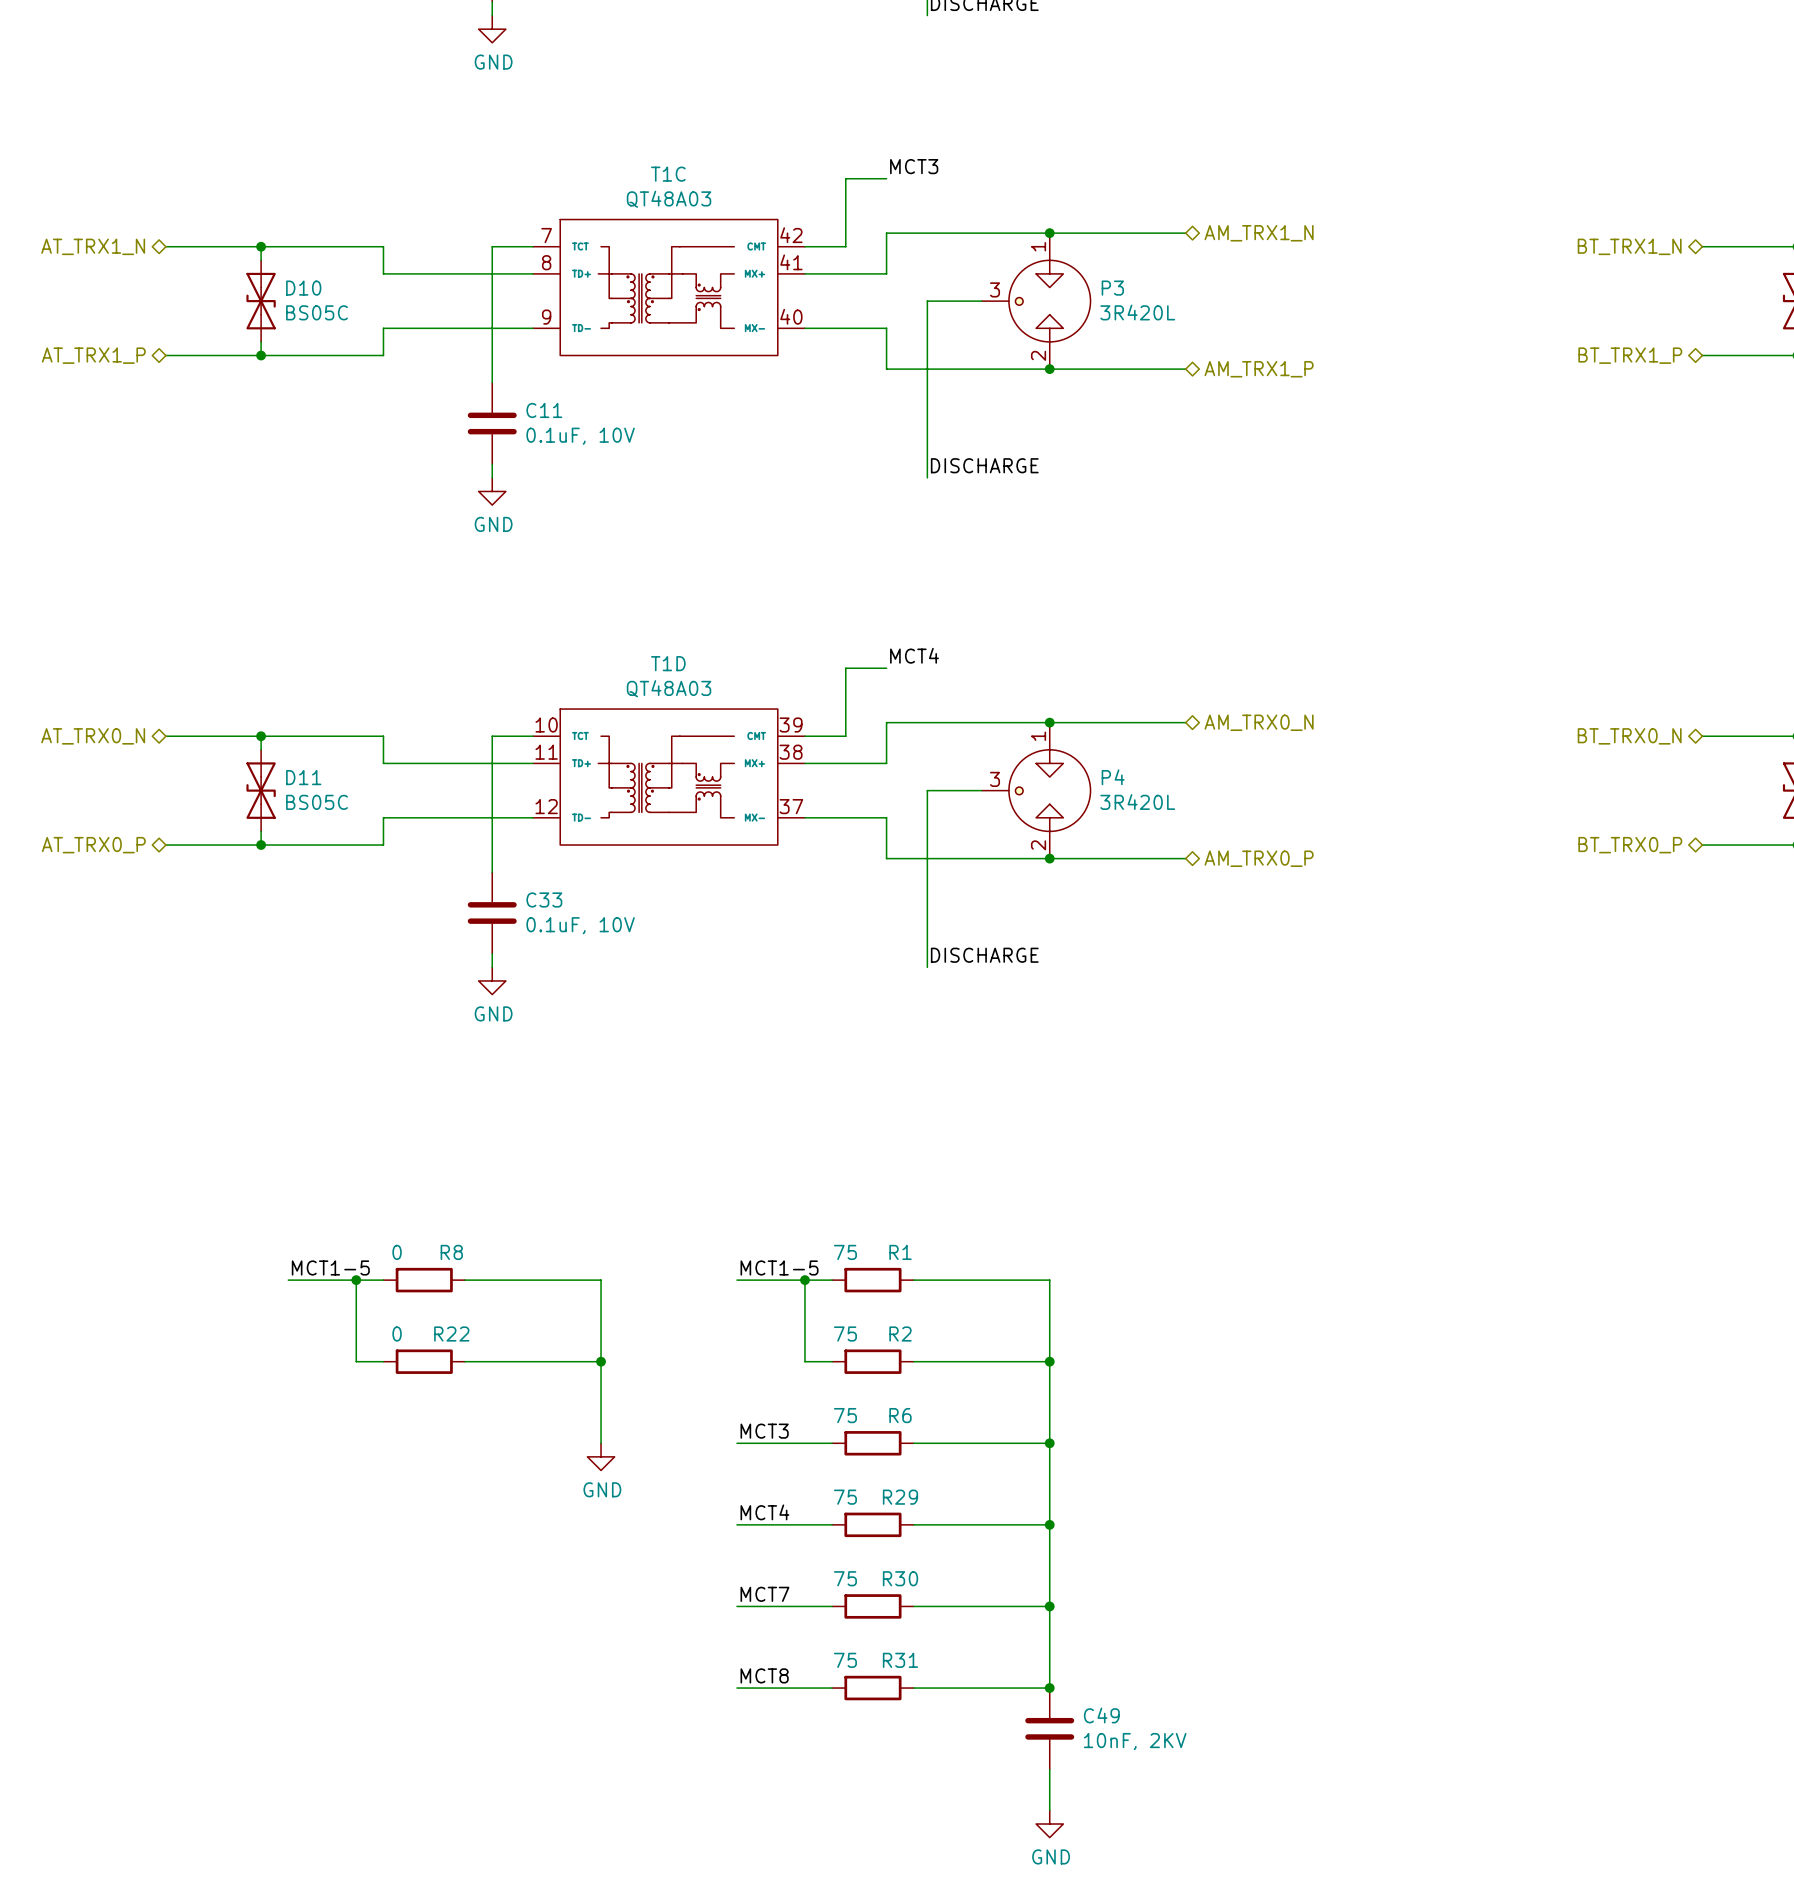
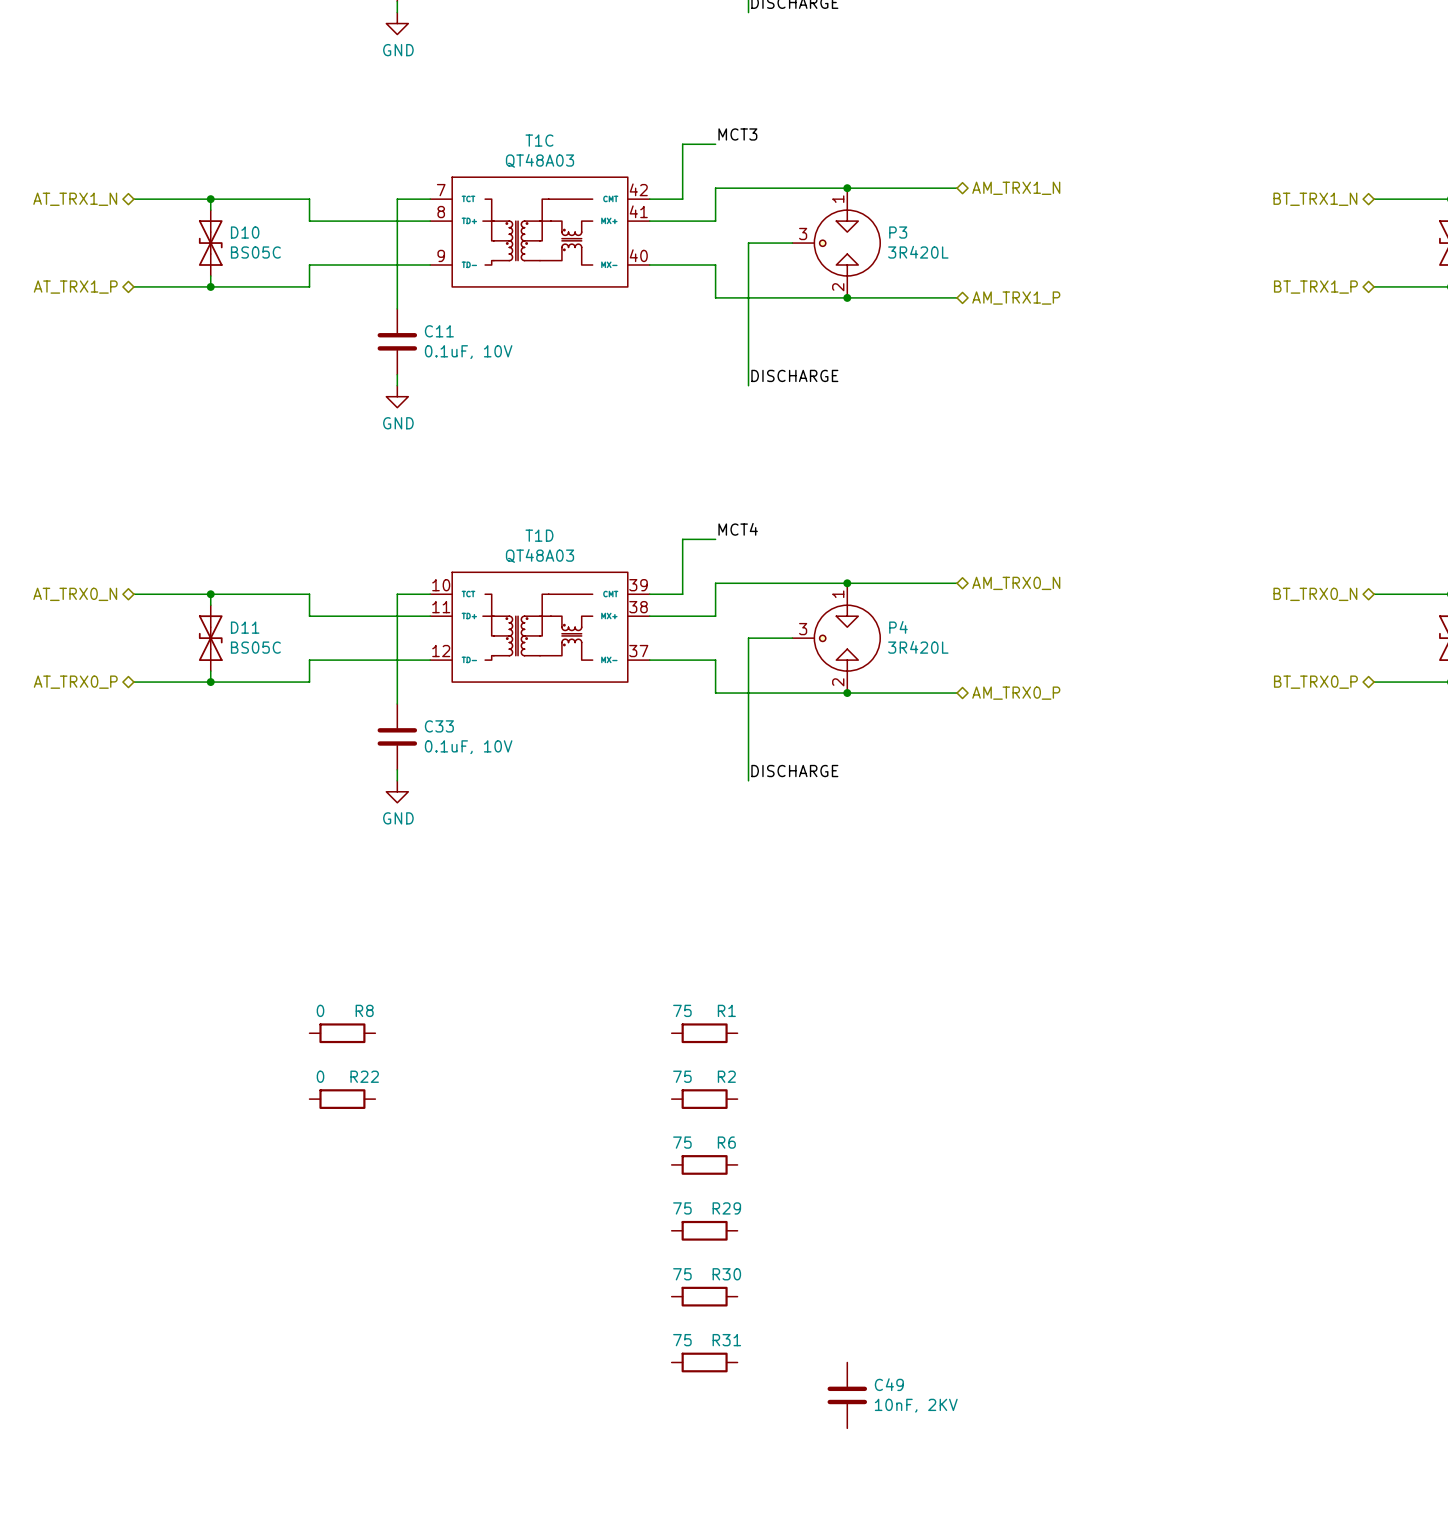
label: MCT1-5 (330, 1267) -> none
label: MCT1-5 (779, 1267) -> none
wire: (288, 1280) (383, 1280) -> none
wire: (356, 1280) (356, 1361) (383, 1361) -> none
junction: (356, 1280) -> none
wire: (465, 1280) (601, 1280) (601, 1443) -> none
wire: (737, 1280) (832, 1280) -> none
wire: (804, 1280) (804, 1361) (832, 1361) -> none
junction: (804, 1280) -> none
wire: (913, 1280) (1049, 1280) (1049, 1688) (913, 1688) -> none
wire: (465, 1361) (601, 1361) -> none
junction: (601, 1361) -> none
wire: (913, 1361) (1049, 1361) -> none
junction: (1049, 1361) -> none
label: MCT3 (764, 1431) -> none
wire: (737, 1443) (832, 1443) -> none
wire: (913, 1443) (1049, 1443) -> none
junction: (1049, 1443) -> none
power symbol: GND (601, 1456) -> none
label: MCT4 (764, 1512) -> none
wire: (737, 1524) (832, 1524) -> none
wire: (913, 1524) (1049, 1524) -> none
junction: (1049, 1524) -> none
label: MCT7 (764, 1594) -> none
wire: (737, 1606) (832, 1606) -> none
wire: (913, 1606) (1049, 1606) -> none
junction: (1049, 1606) -> none
label: MCT8 (764, 1675) -> none
wire: (737, 1688) (832, 1688) -> none
junction: (1049, 1688) -> none
wire: (1049, 1769) (1049, 1810) -> none
power symbol: GND (1049, 1824) -> none

